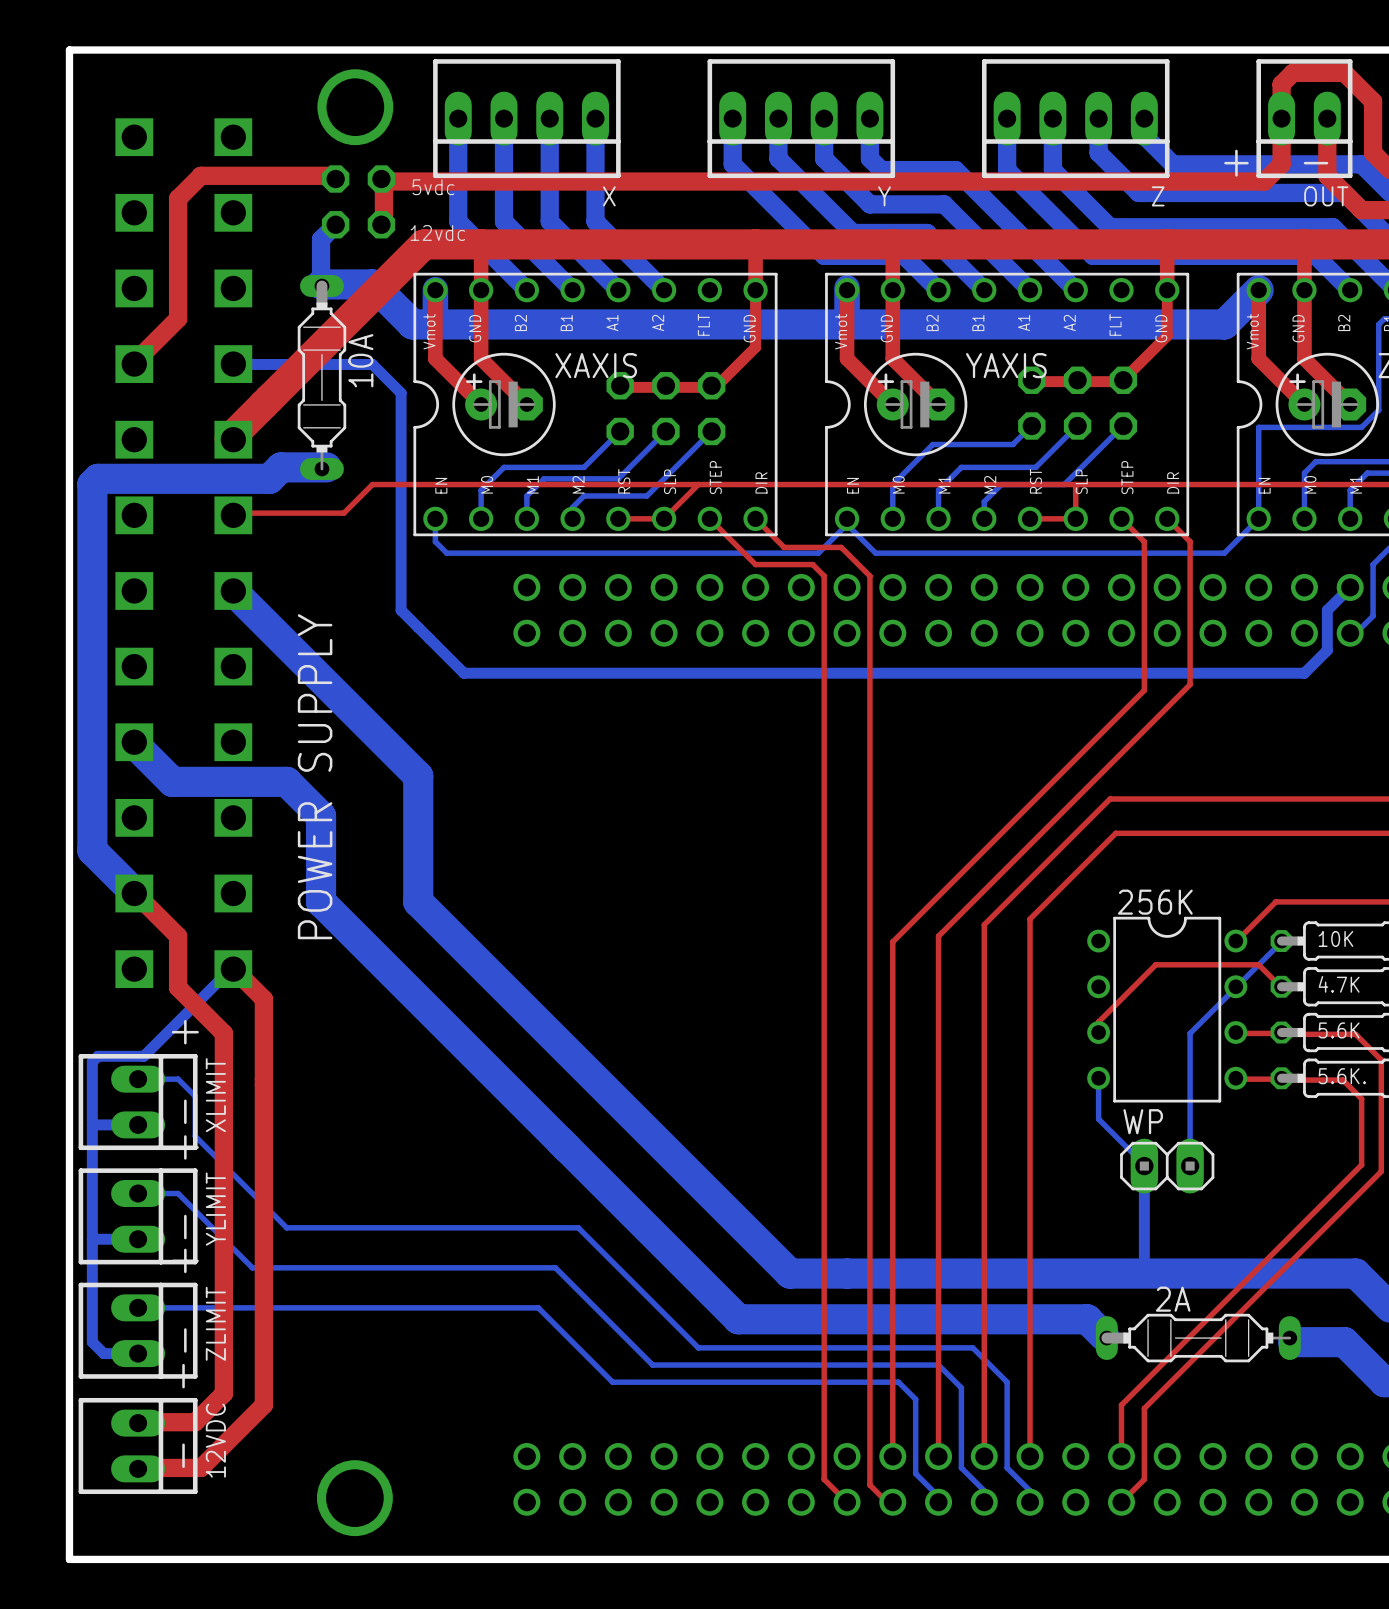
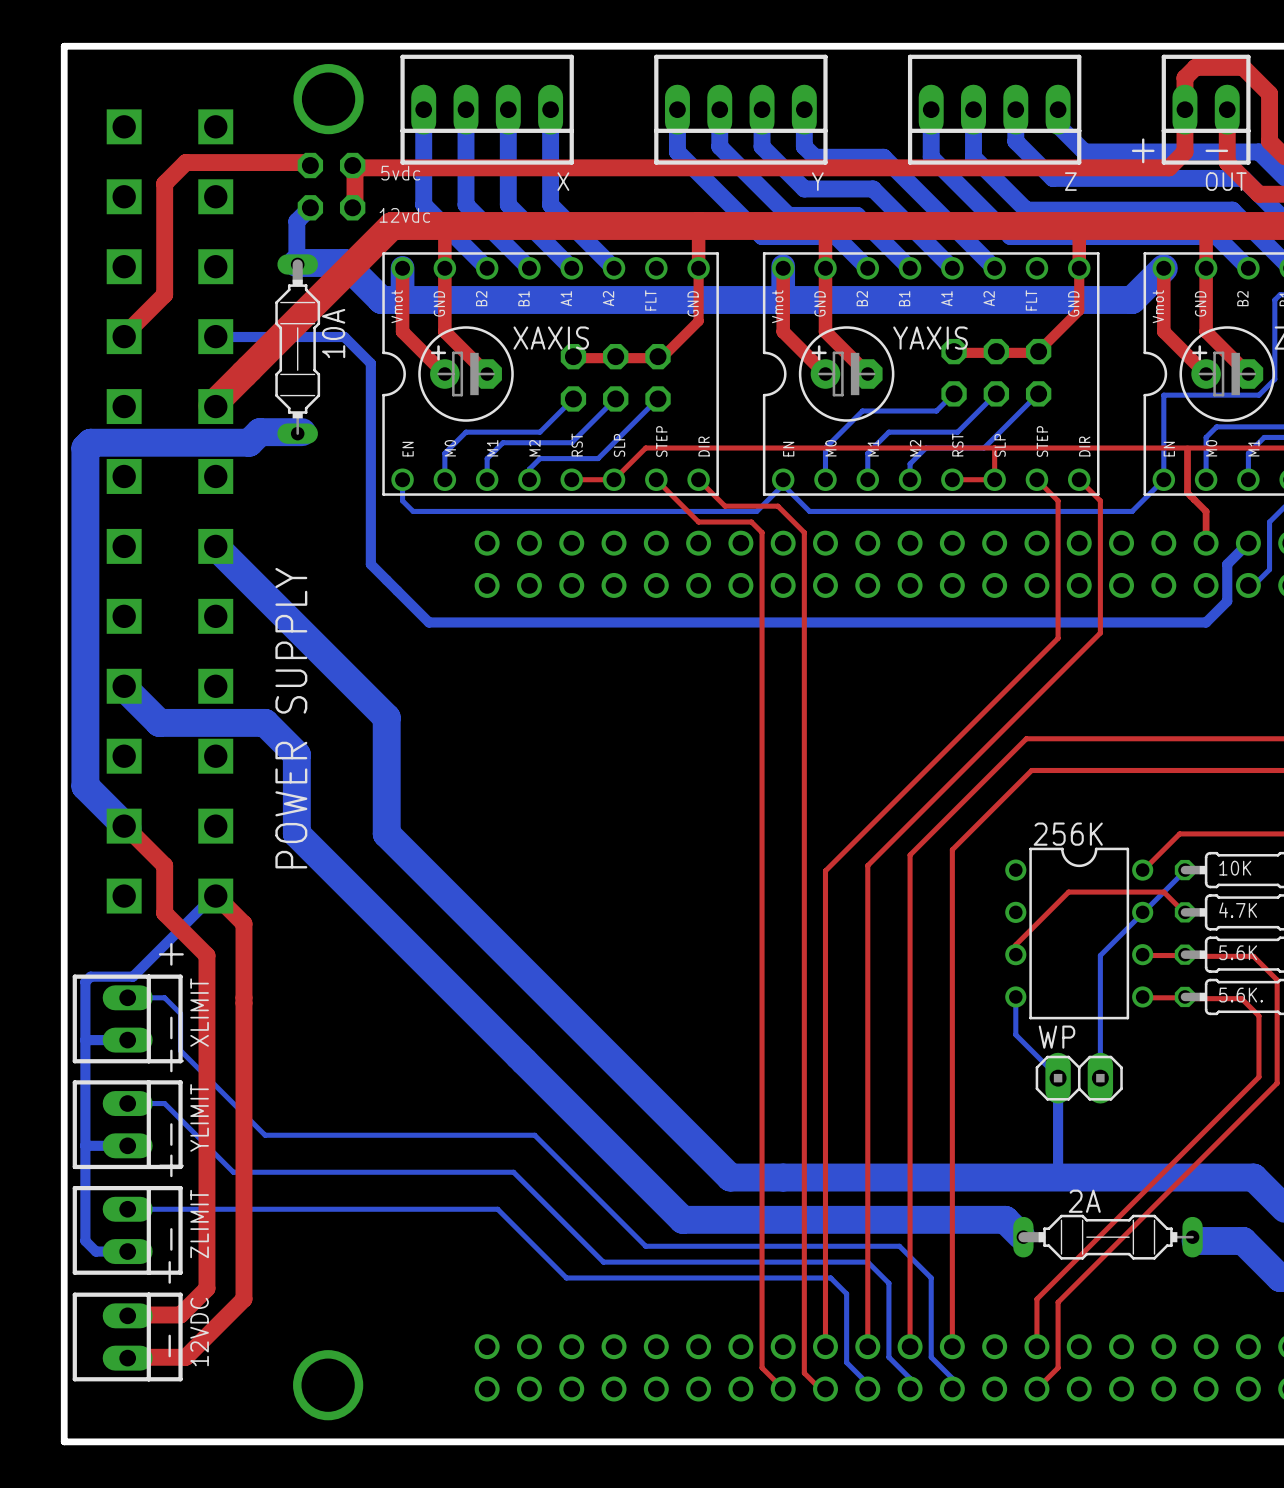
top track: (698, 484) (372, 484) (343, 513) (229, 513) -> none
top track: none -> (1187, 448) (1187, 492) (1206, 511) (1206, 543)

